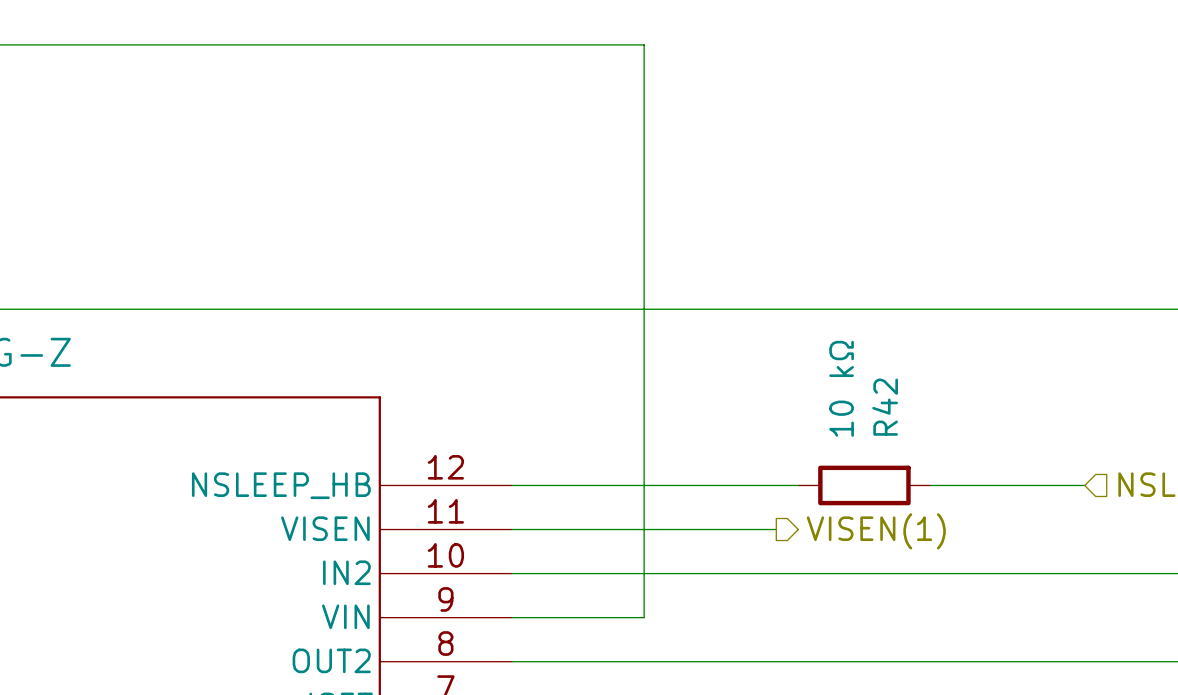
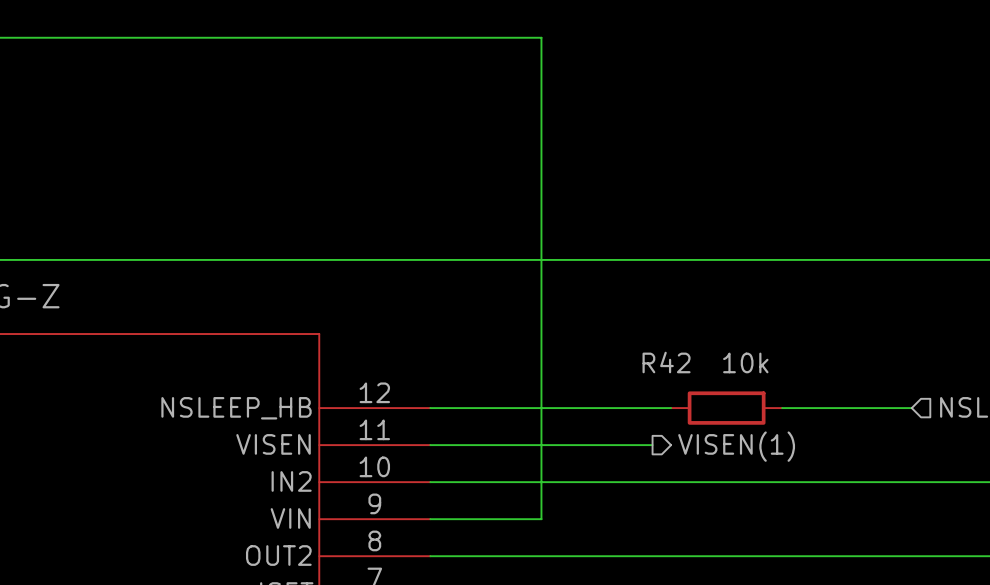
R42 value: 10 kΩ (841, 388) -> 10k (745, 362)
R42 name rotation: 0° (885, 407) -> 90° clockwise (666, 362)
R42 name position: R42 (885, 407) -> R42 (666, 362)

